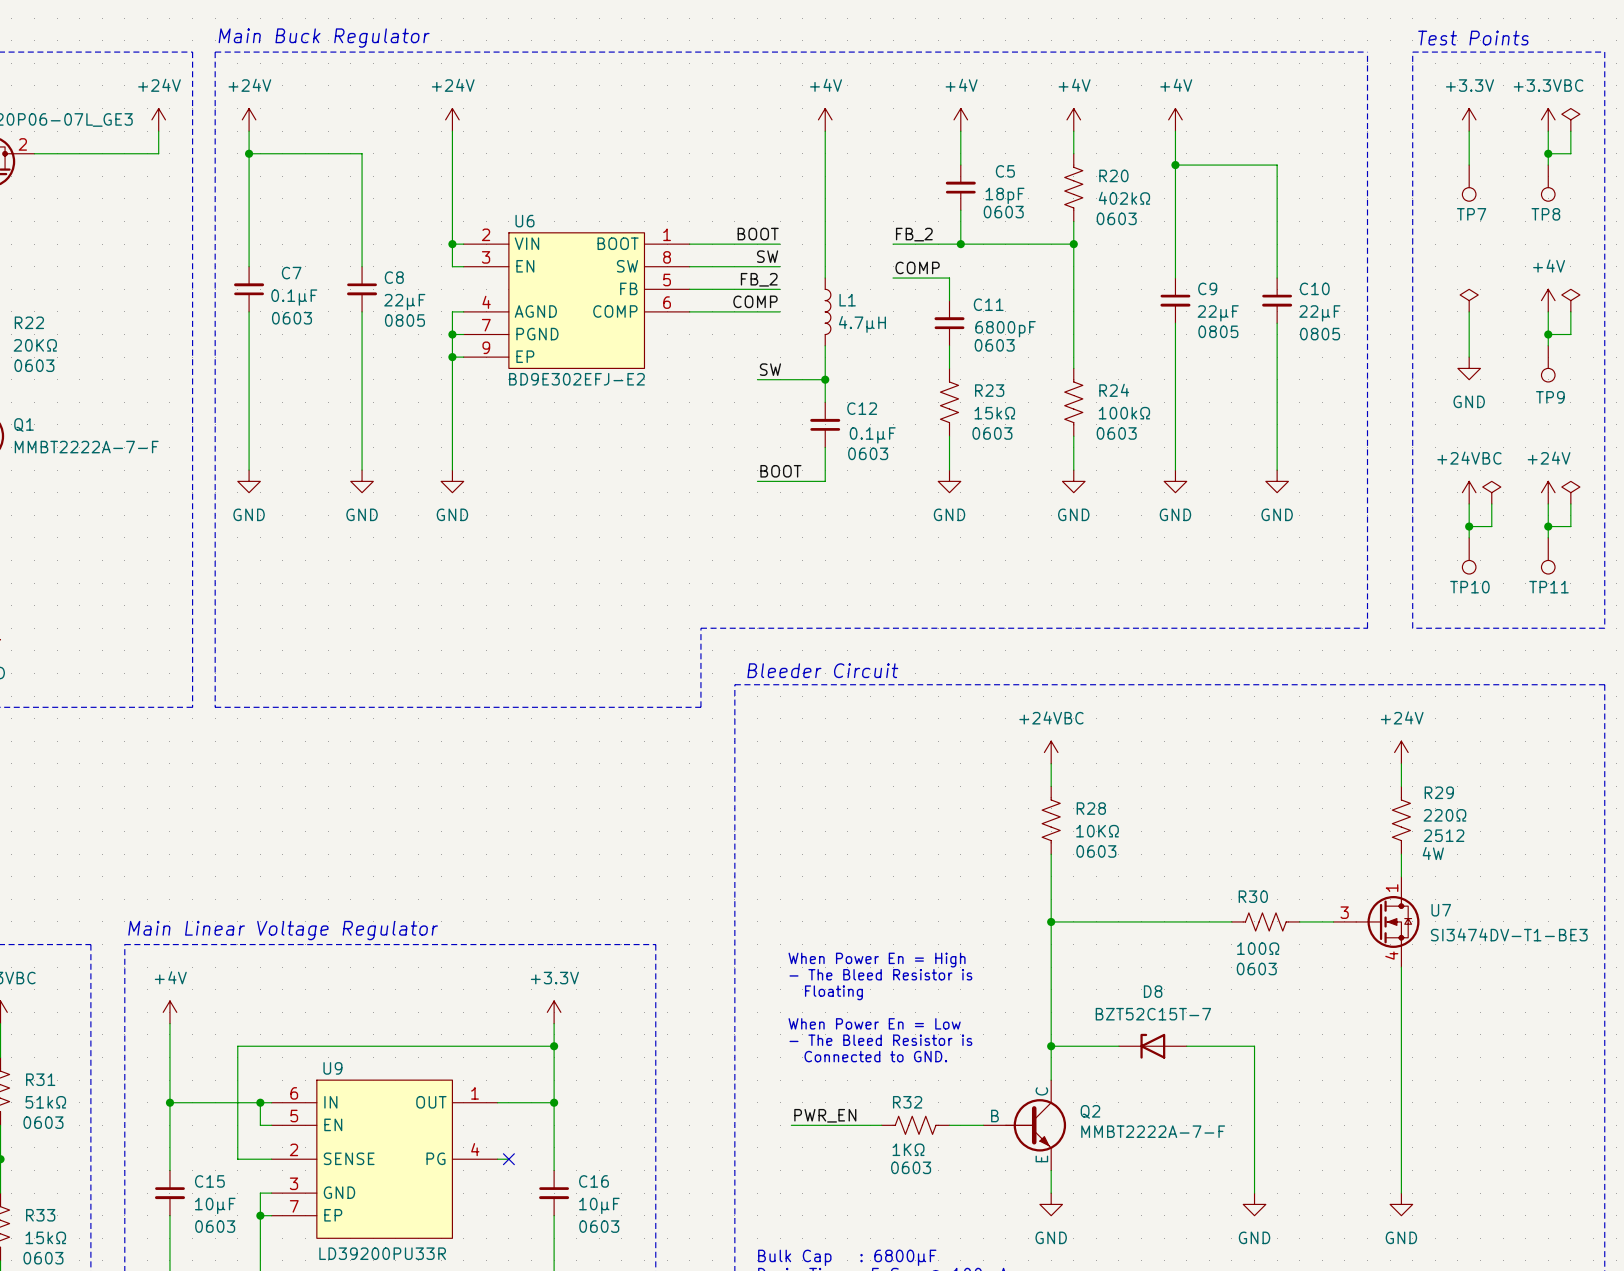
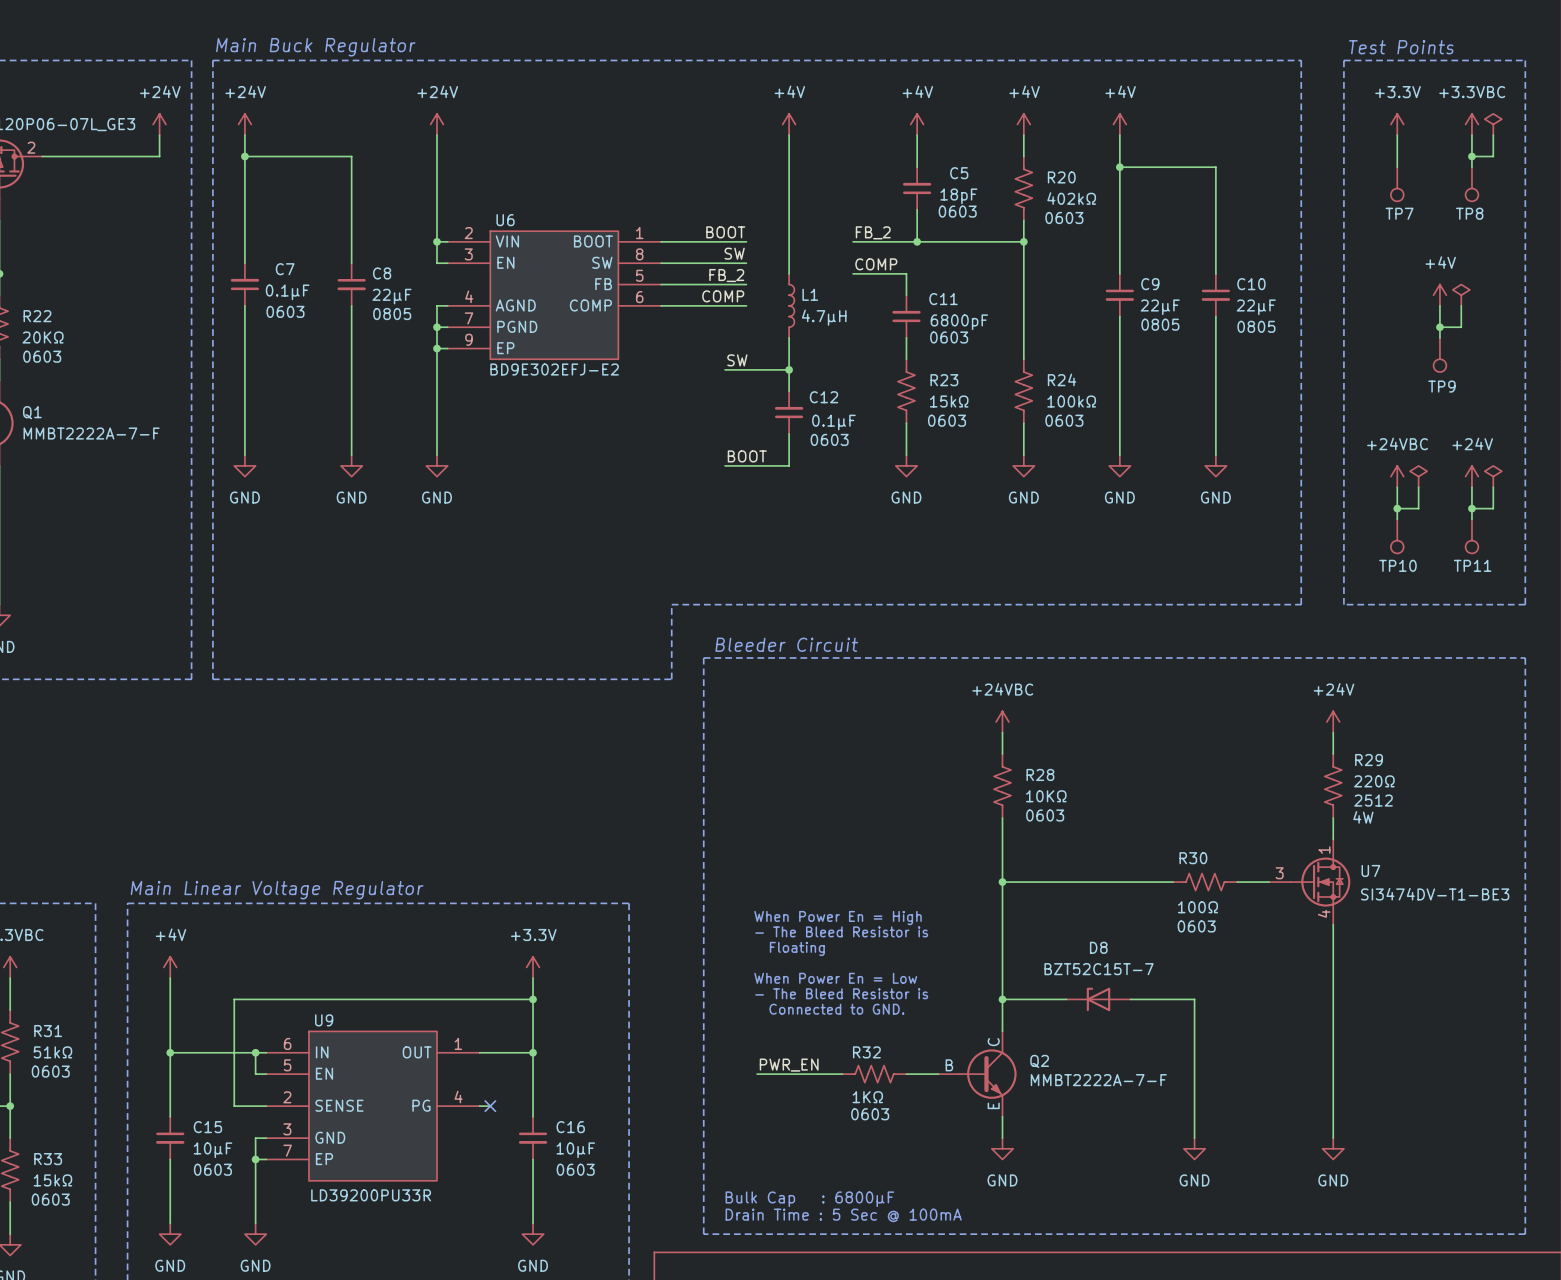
power symbol: (1469, 300) -> none
power symbol: none -> (1461, 295)
power symbol position: +4V (1548, 300) -> +4V (1439, 295)
power symbol: (1570, 300) -> none
wire: (1469, 311) (1469, 357) -> none
wire: (1548, 311) (1548, 345) -> (1439, 305) (1439, 337)
wire: (1570, 311) (1570, 334) (1548, 334) -> (1461, 305) (1461, 327) (1439, 327)
junction position: (1548, 334) -> (1439, 327)
TP9 position: (1548, 363) -> (1439, 354)
power symbol: GND (1469, 368) -> none

